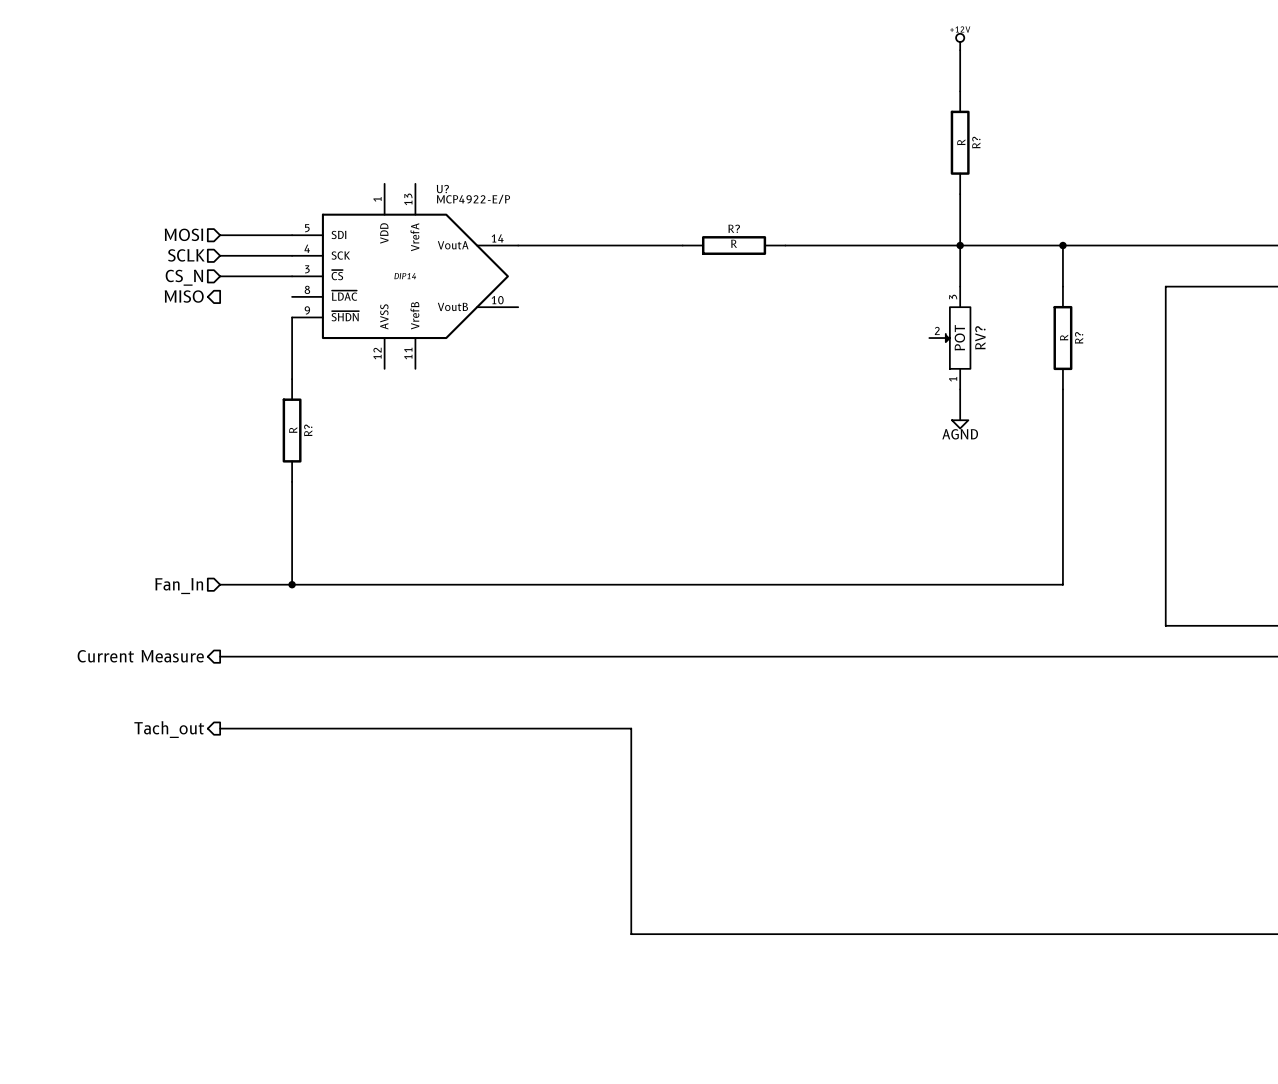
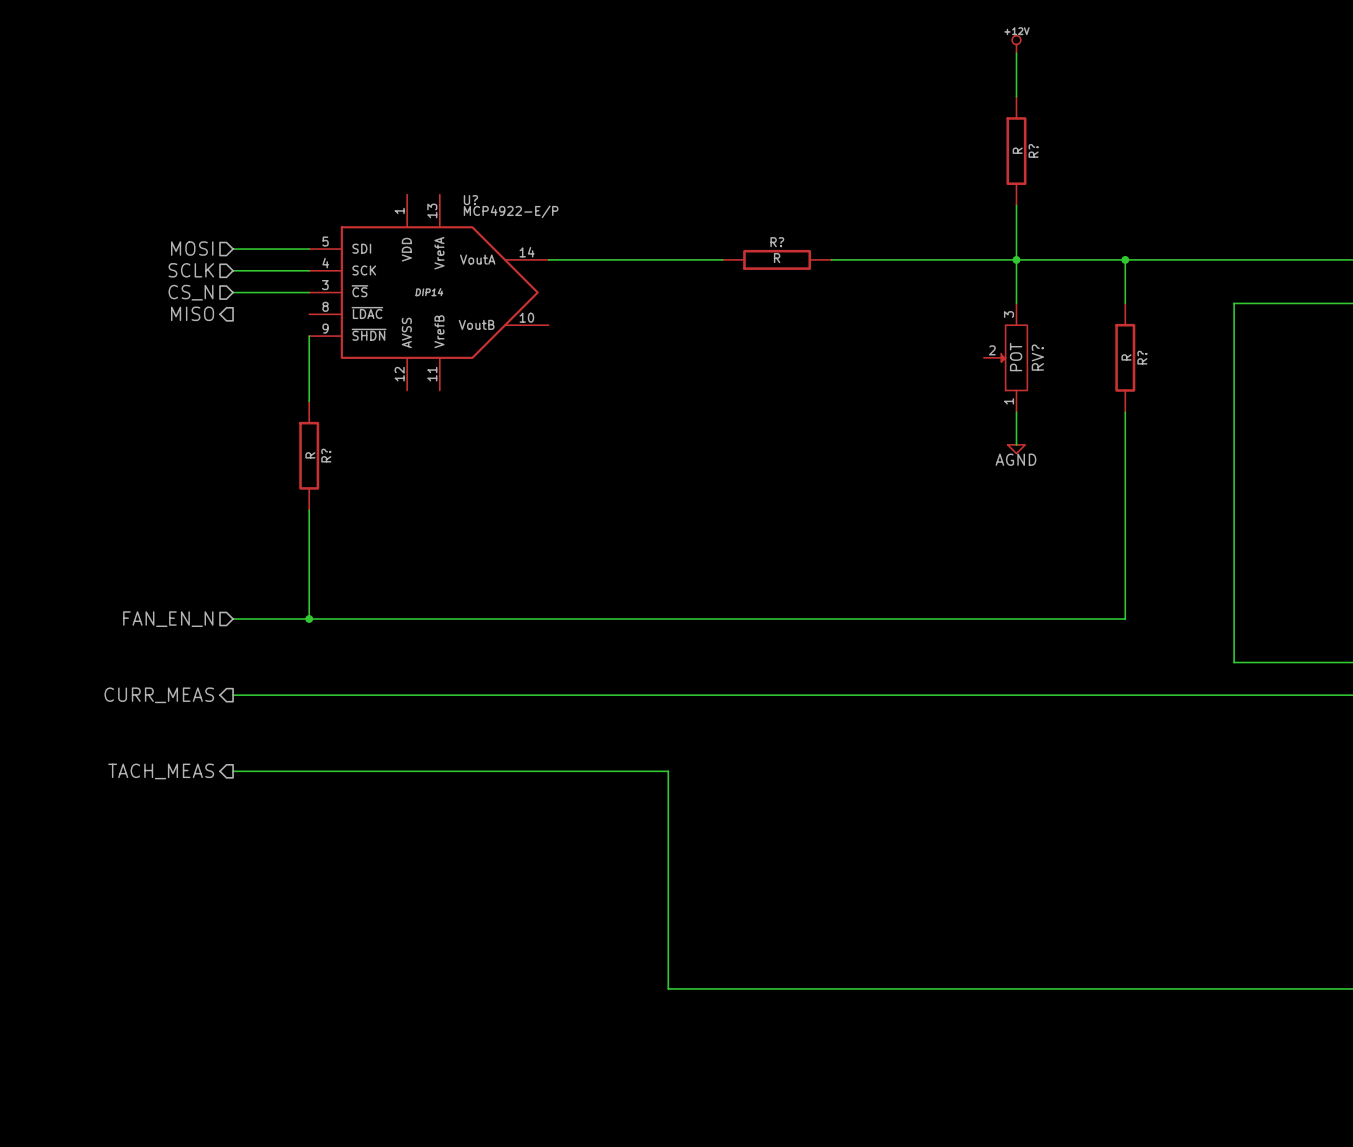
hierarchical label: Fan_In (179, 586) -> FAN_EN_N (168, 619)
hierarchical label: Current Measure (140, 656) -> CURR_MEAS (159, 695)
hierarchical label: Tach_out (169, 729) -> TACH_MEAS (161, 771)

